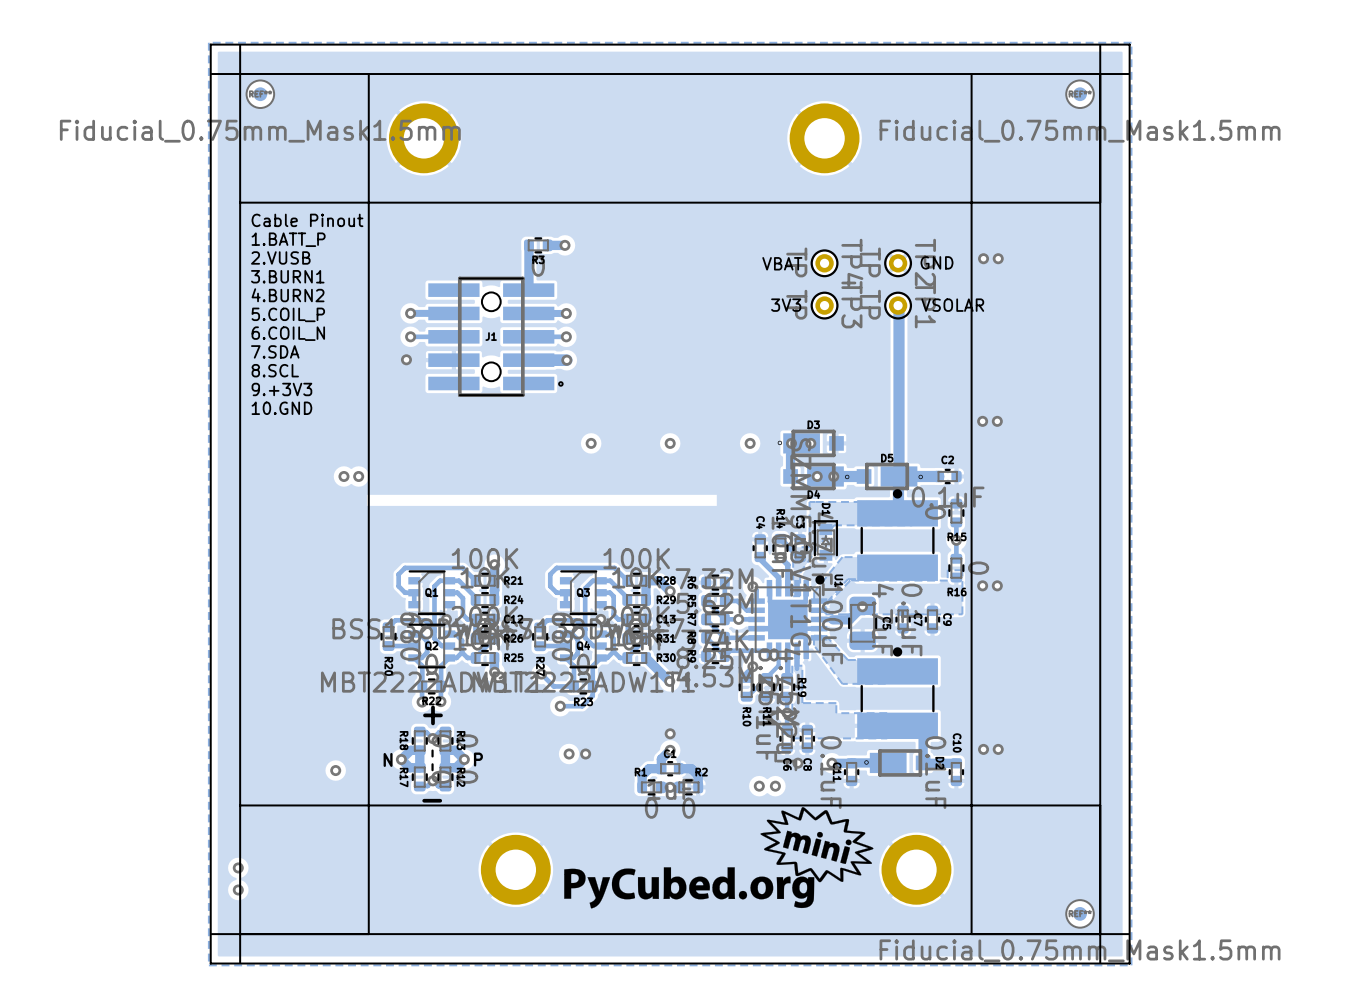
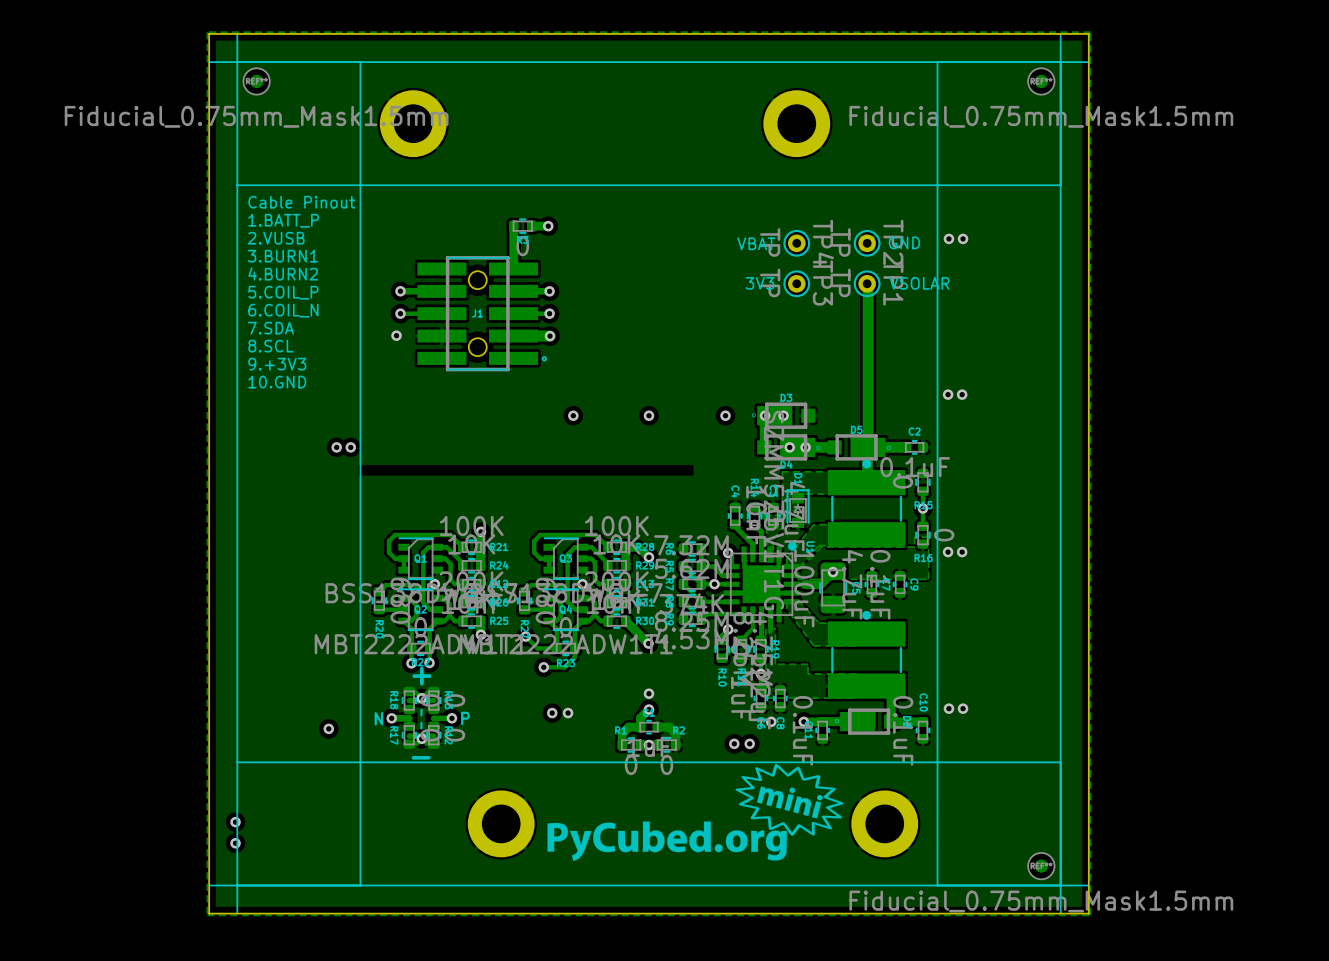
track: none -> (433, 700) (424, 700) (421, 698) (419, 700) (409, 700)
track: (419, 750) (410, 750) (401, 759) (409, 767) (419, 767) (419, 750) -> none
track: (455, 750) (464, 759) (456, 767) (445, 767) (445, 750) (455, 750) -> none
track: none -> (409, 718) (391, 718)
track: none -> (451, 718) (434, 718)
track: none -> (433, 736) (424, 736) (421, 738) (419, 736) (409, 736)

